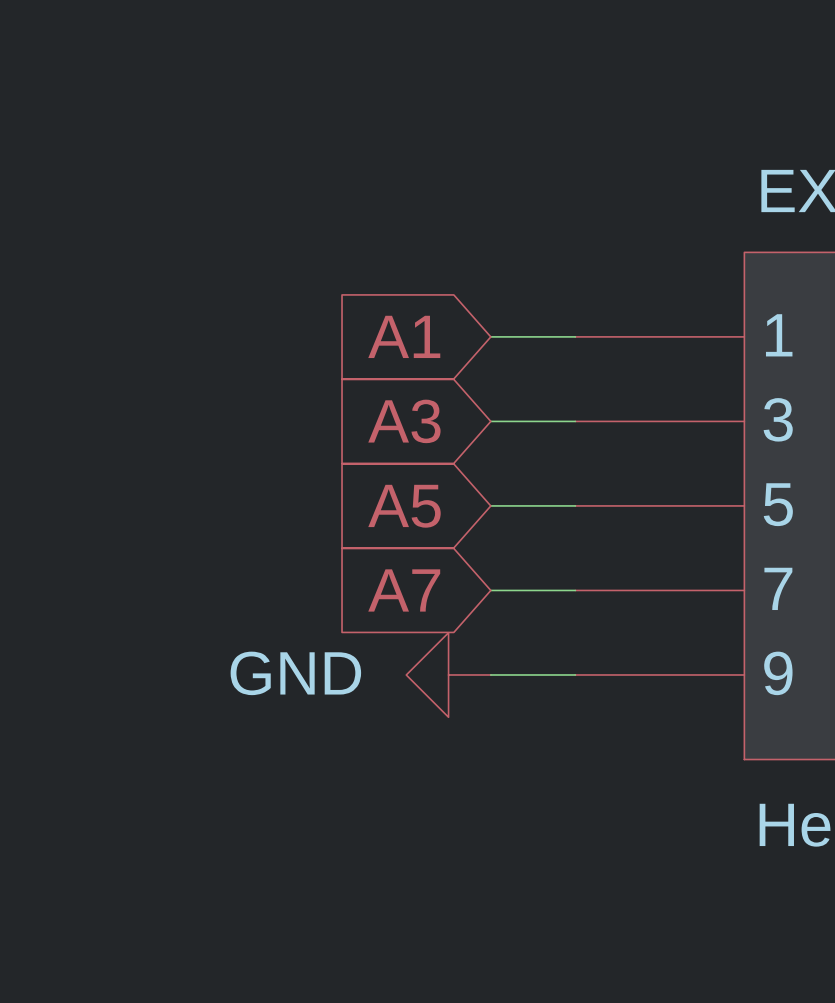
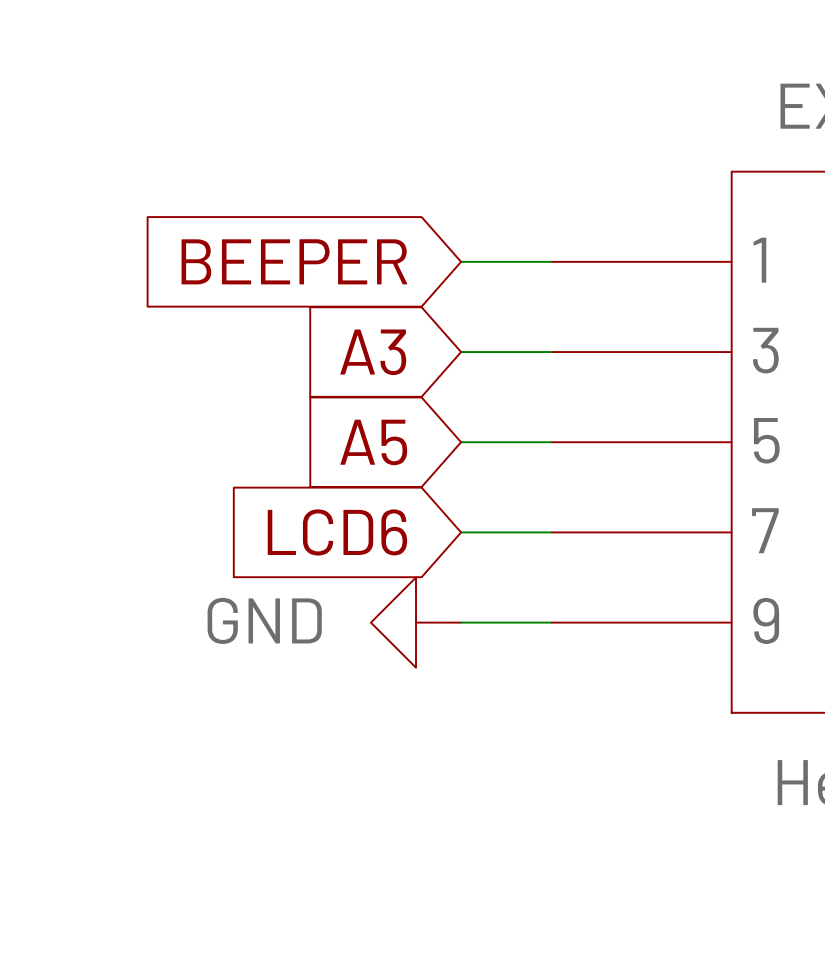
global label: A1 (404, 336) -> BEEPER (294, 261)
global label: A7 (404, 590) -> LCD6 (337, 532)

